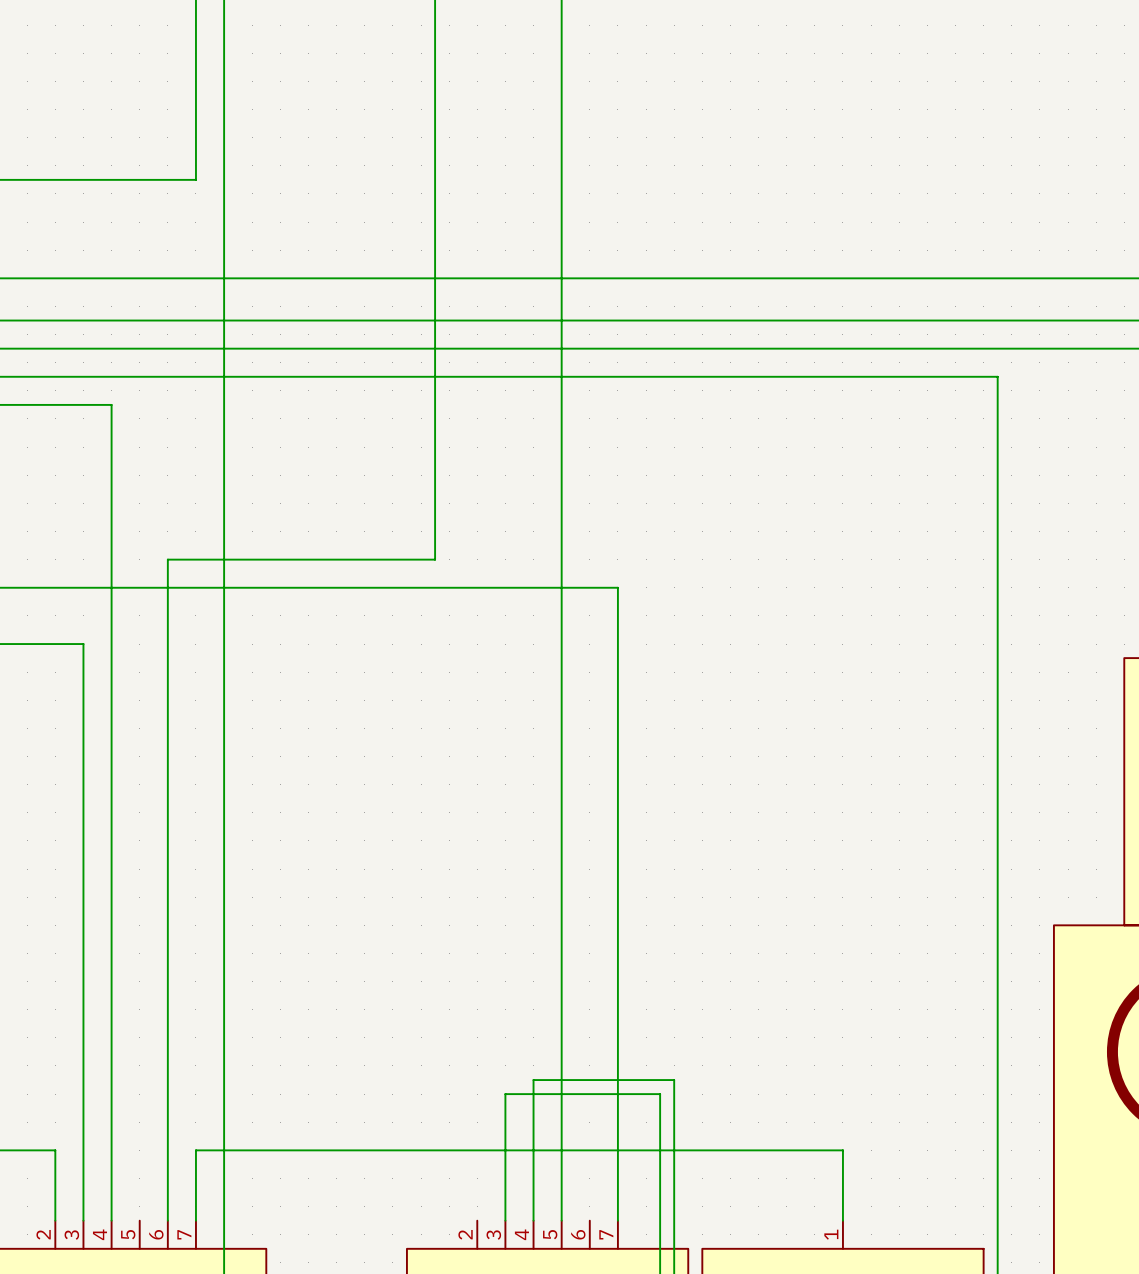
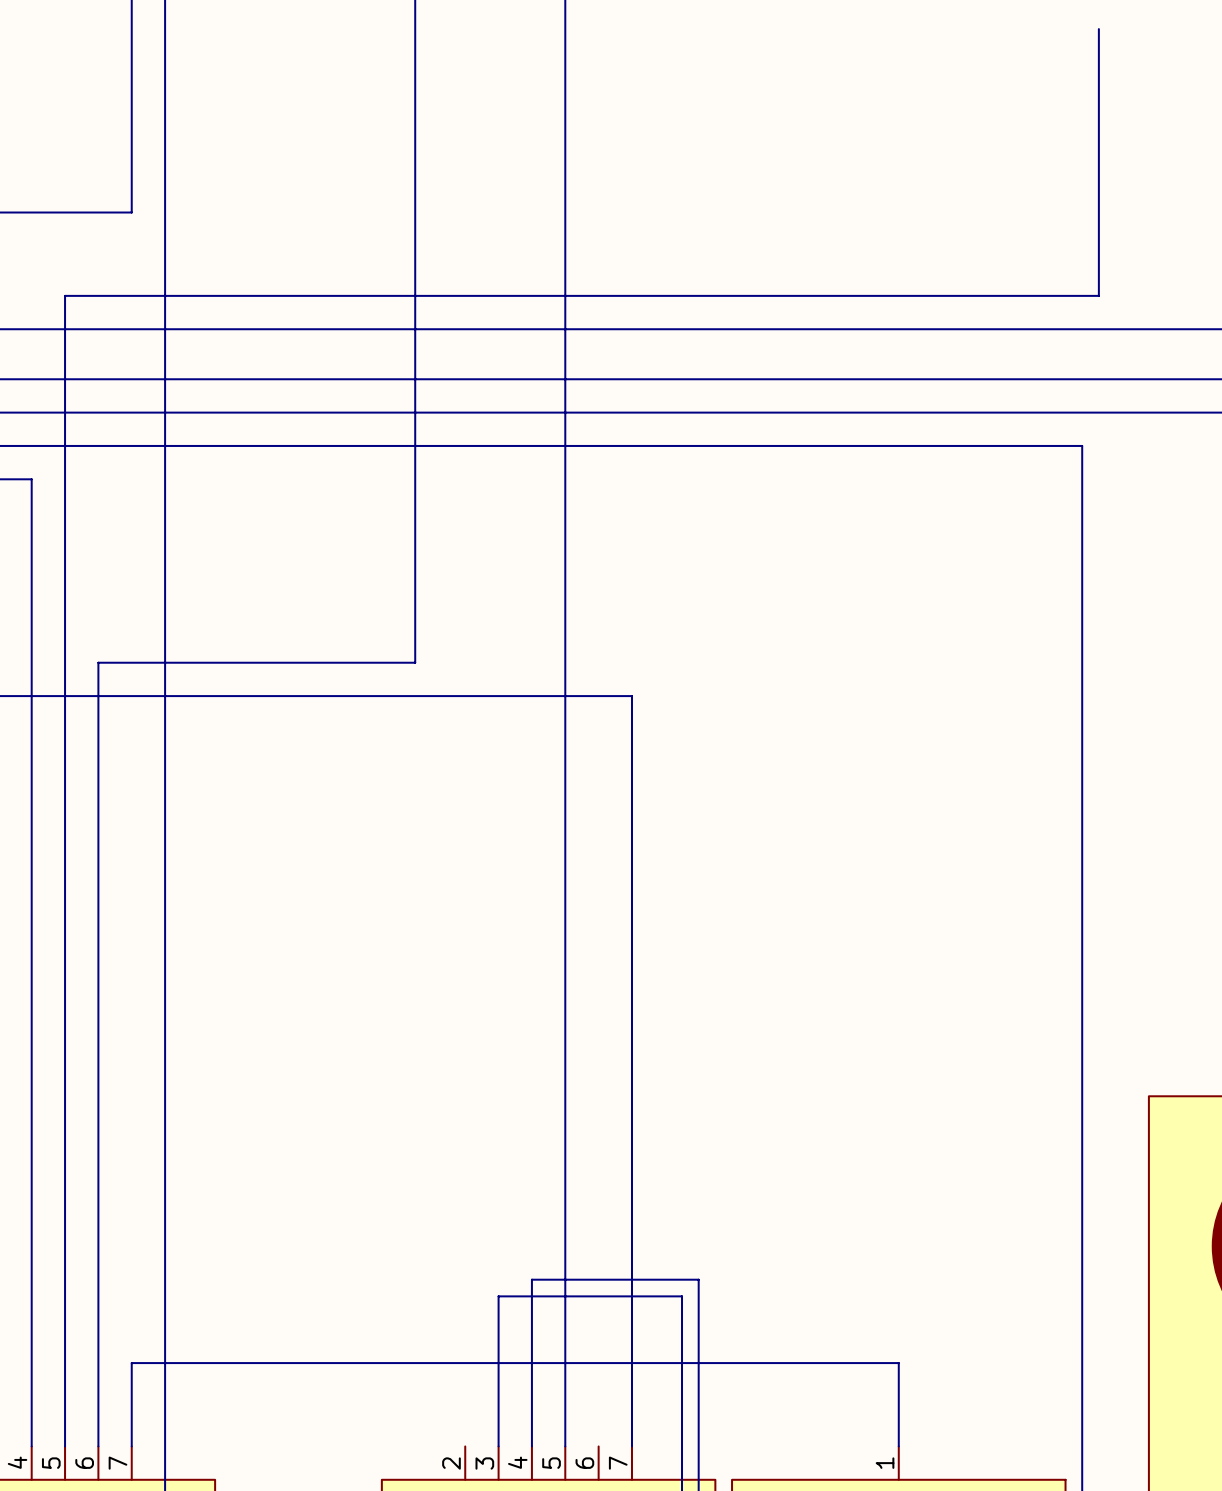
wire: none -> (1098, 29) (1098, 295) (65, 295) (65, 1446)

